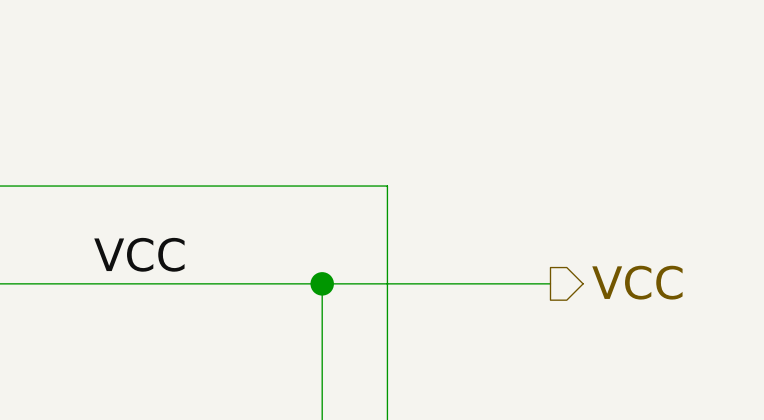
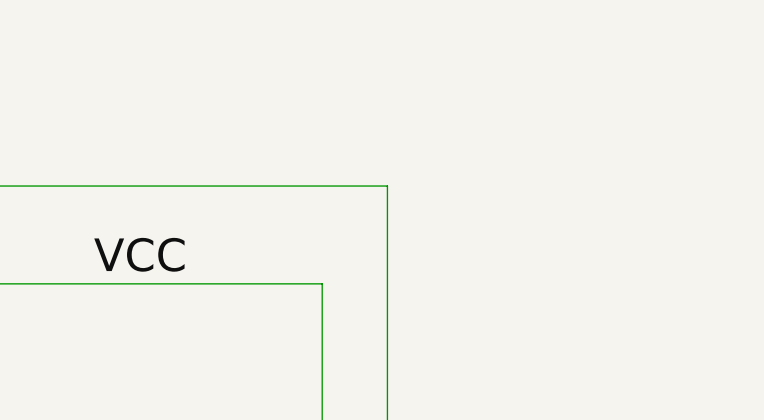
hierarchical label: VCC (637, 282) -> none
wire: (322, 283) (550, 283) -> none
junction: (322, 283) -> none

